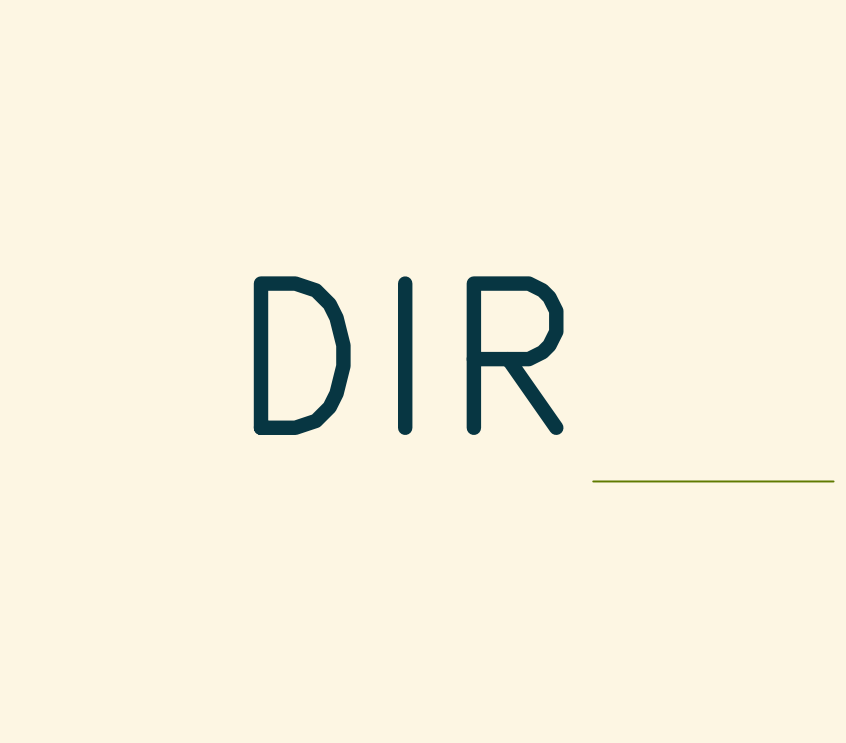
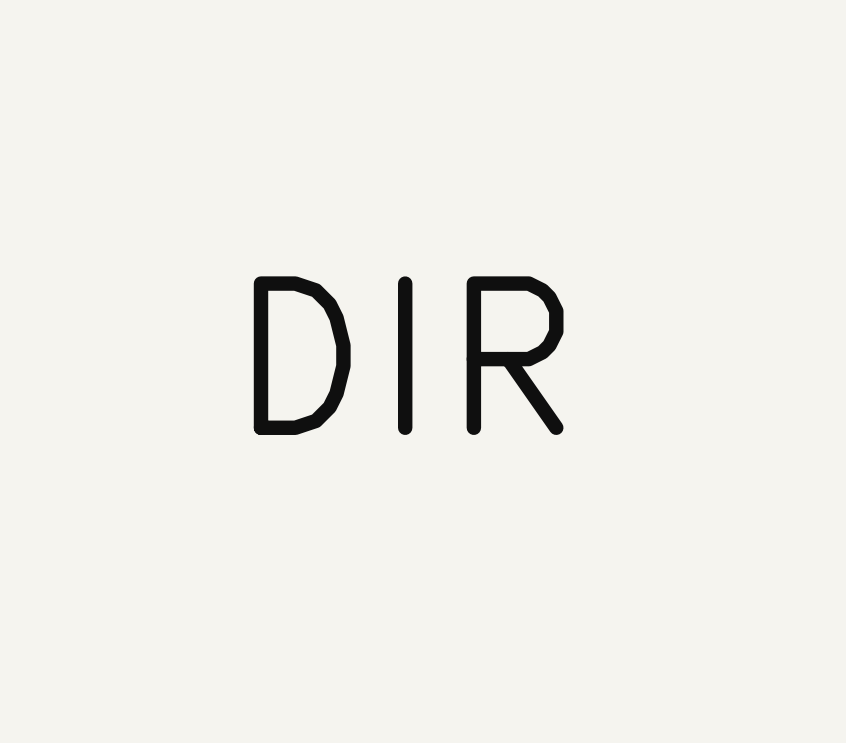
wire: (593, 481) (833, 481) -> none

